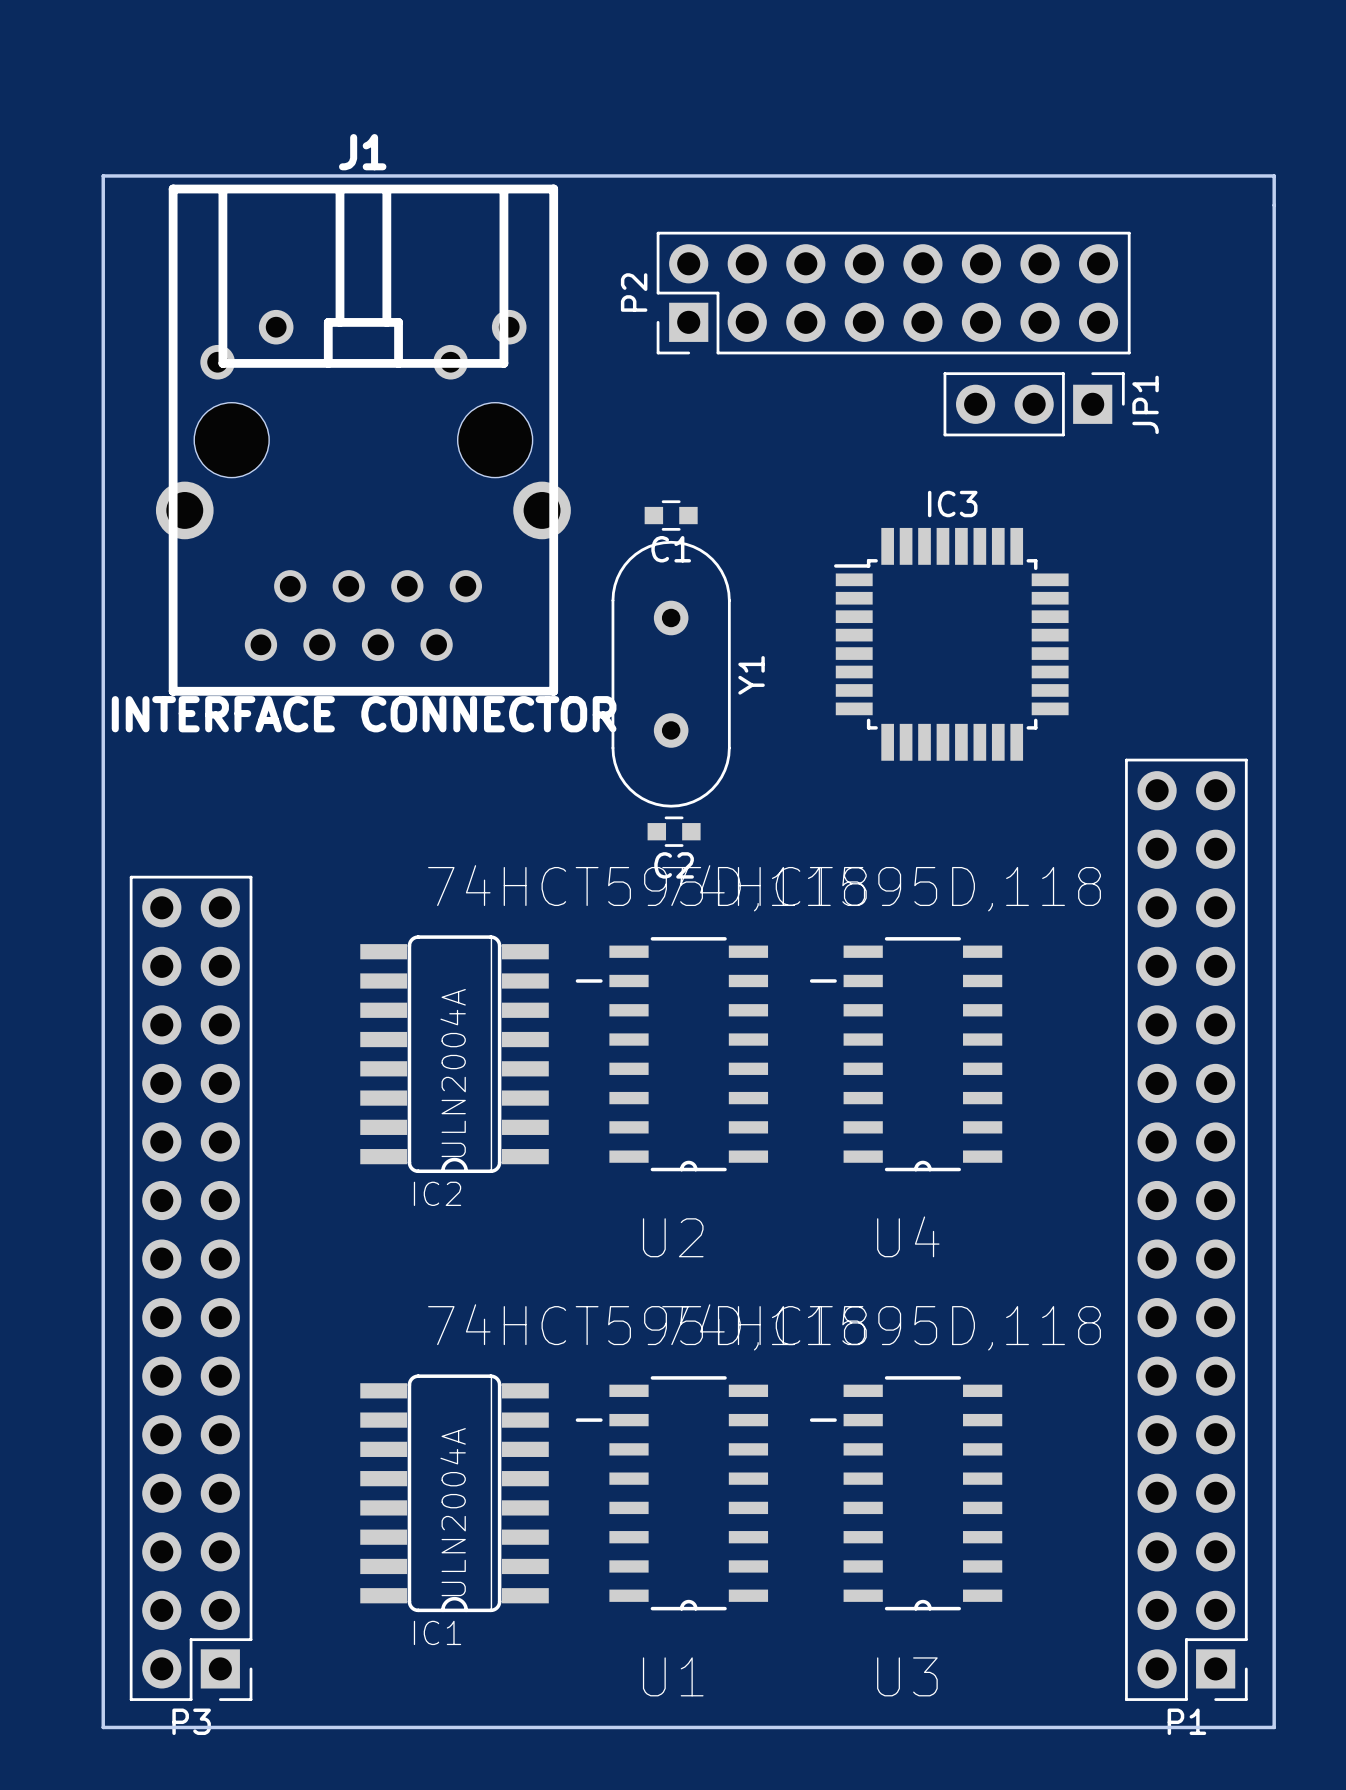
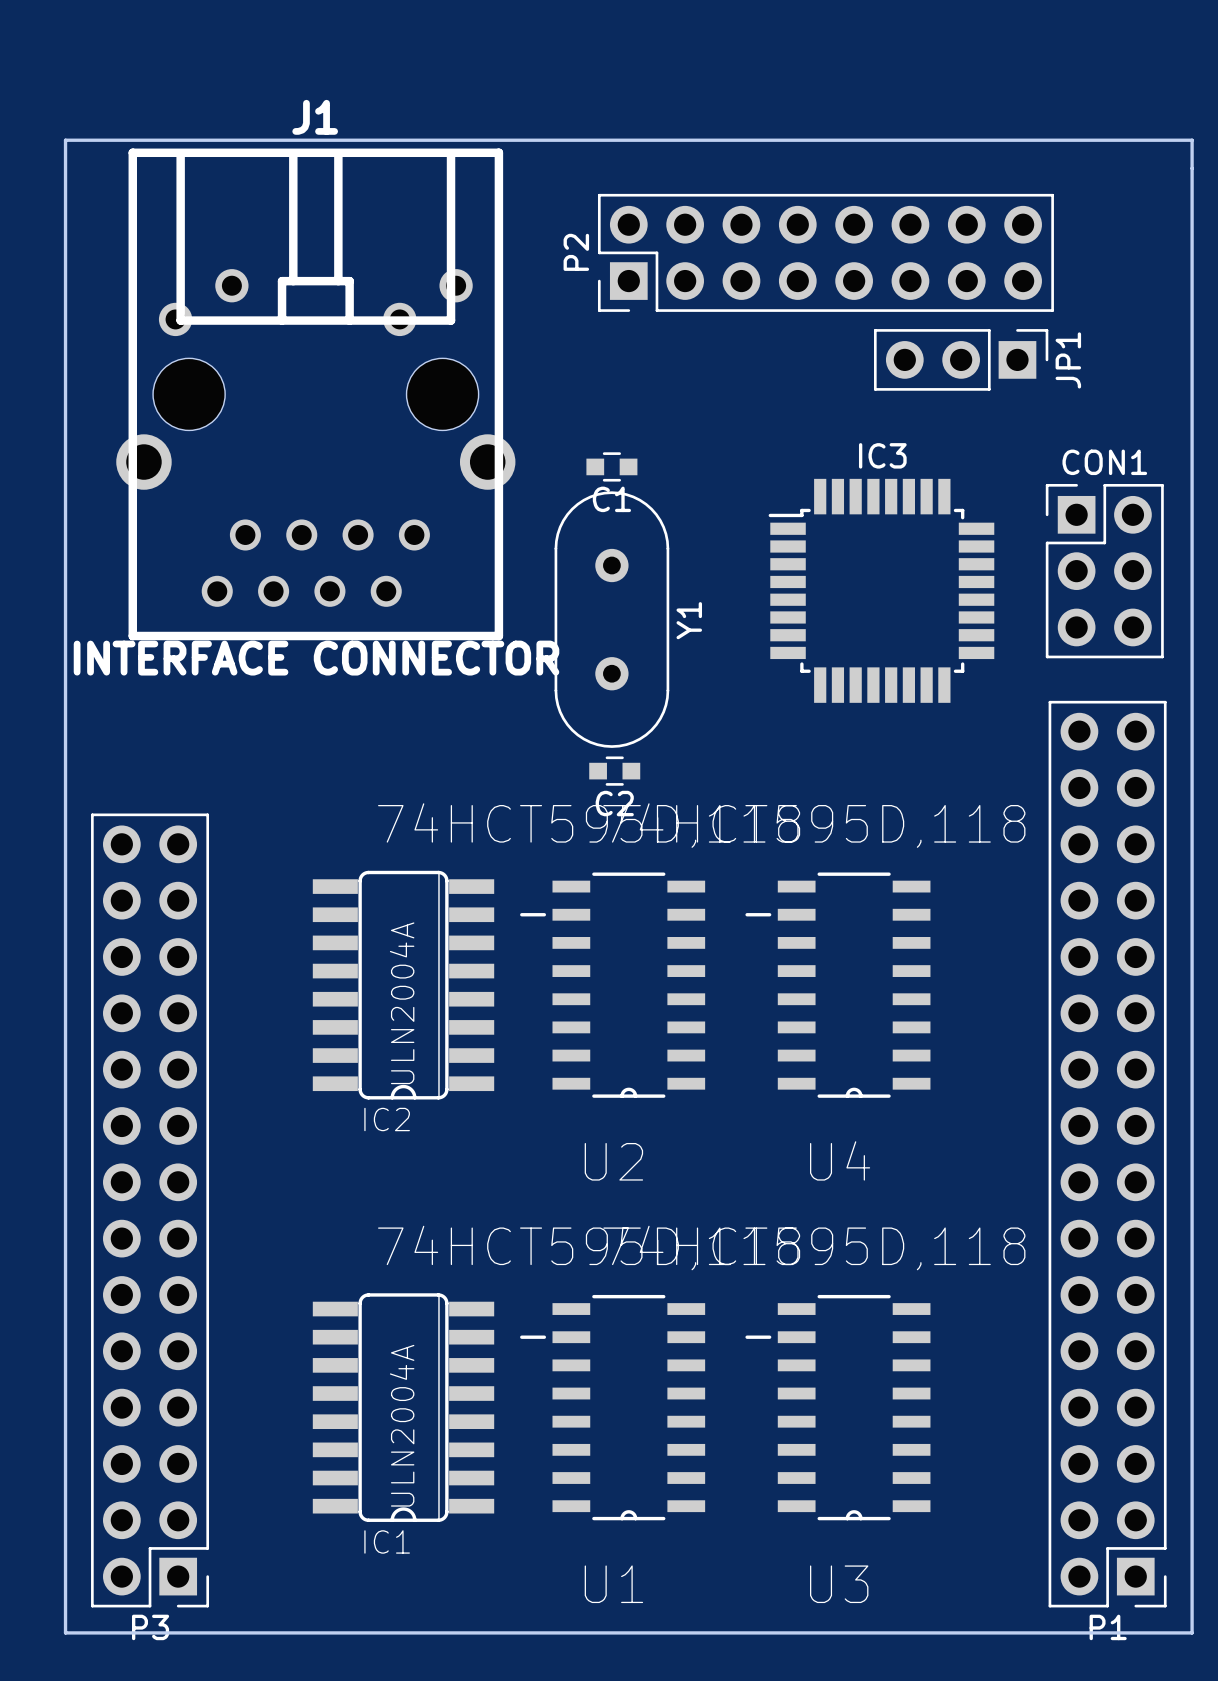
CON1: none -> (1104, 571)

